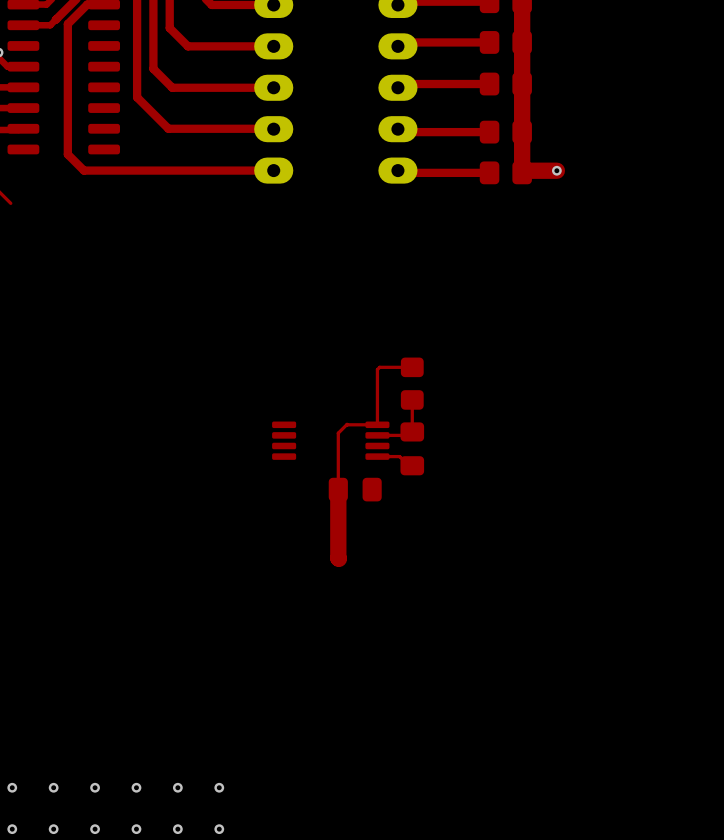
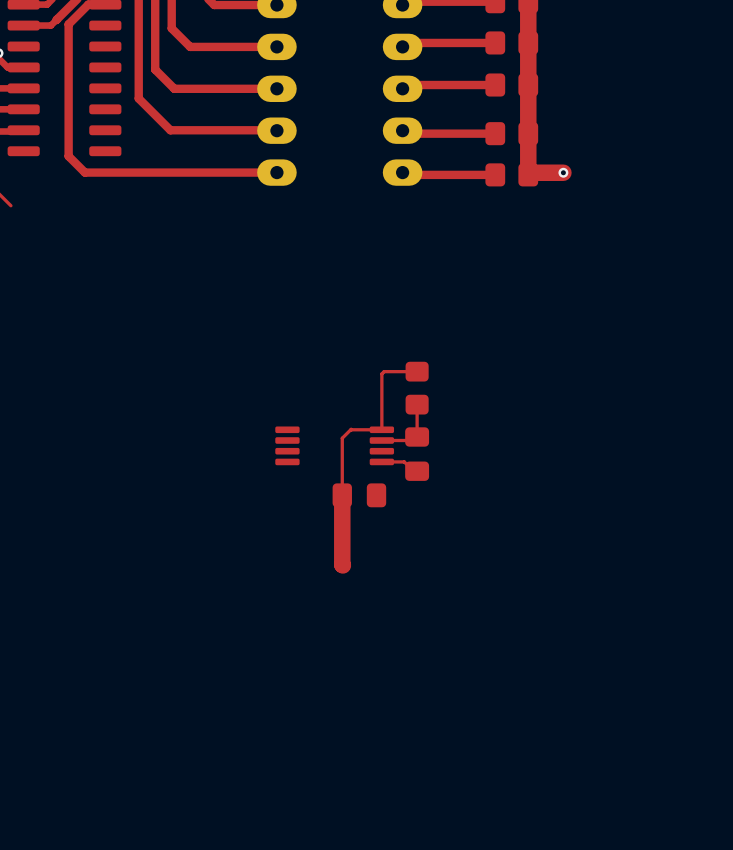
via: (12, 787) -> none
via: (53, 787) -> none
via: (95, 787) -> none
via: (136, 787) -> none
via: (177, 787) -> none
via: (219, 787) -> none
via: (12, 829) -> none
via: (53, 829) -> none
via: (95, 829) -> none
via: (136, 829) -> none
via: (177, 829) -> none
via: (219, 829) -> none

